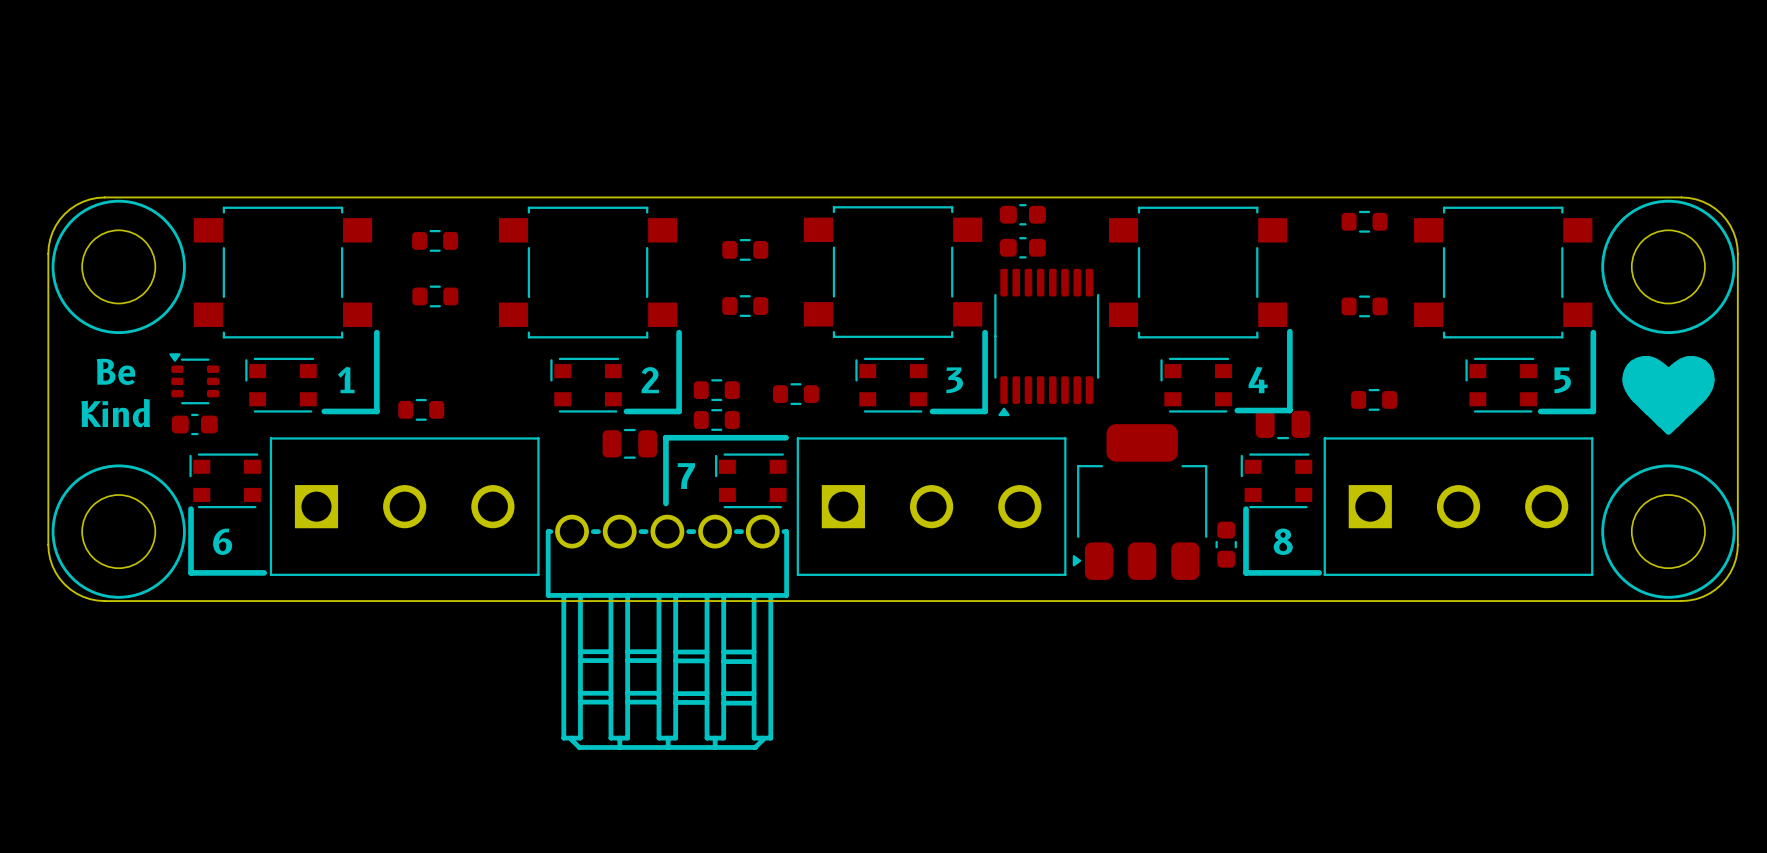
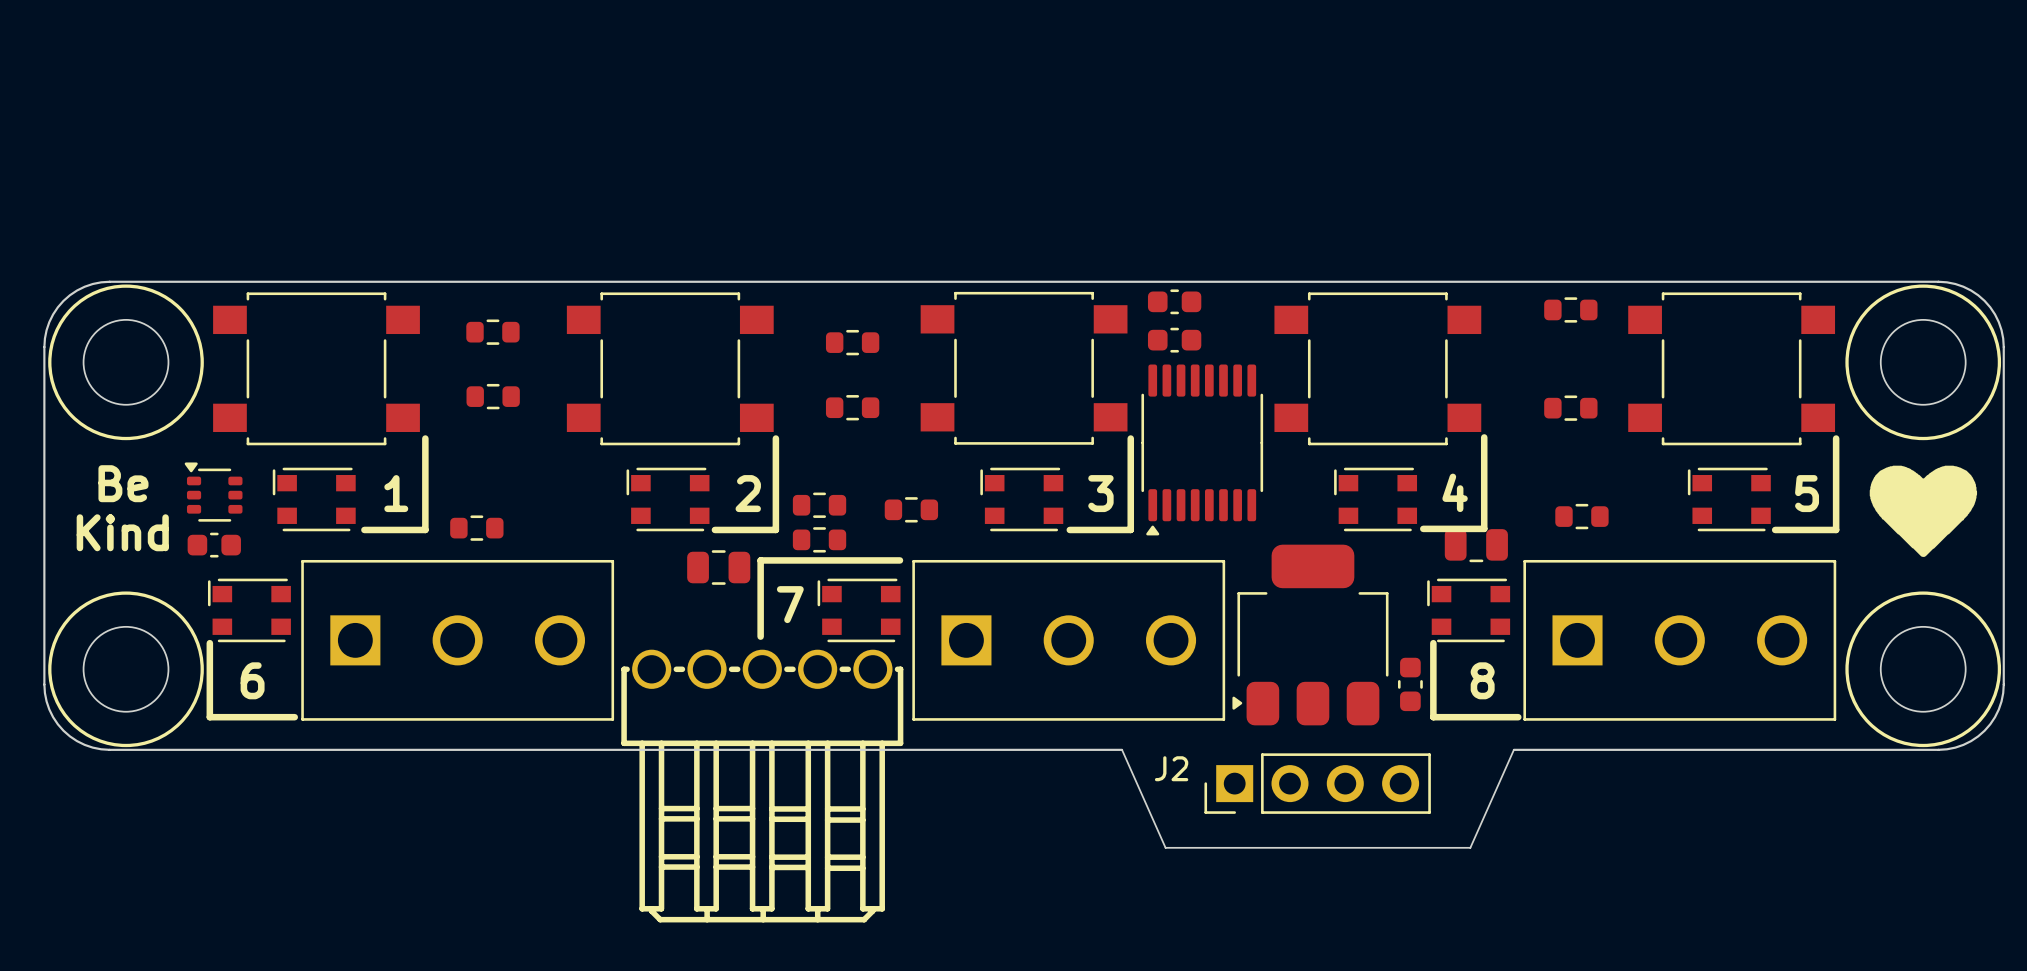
board edge: (977, 601) (1315, 601) -> (1122, 749) (1165, 847) (1470, 847) (1513, 749)
J2: none -> (1317, 783)

